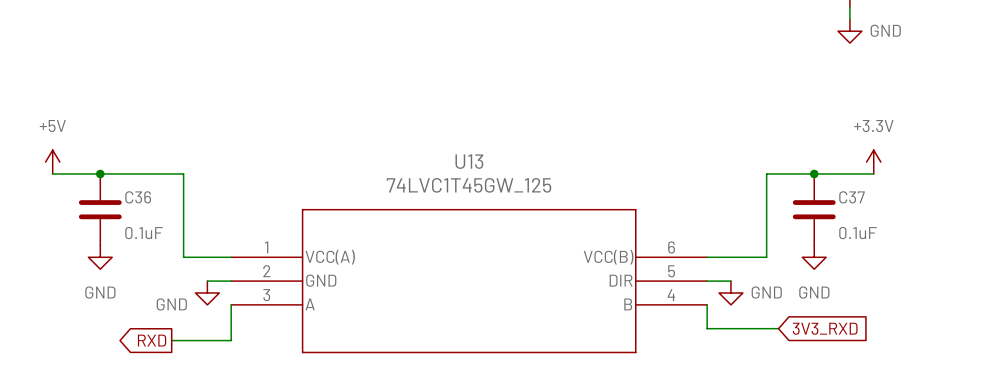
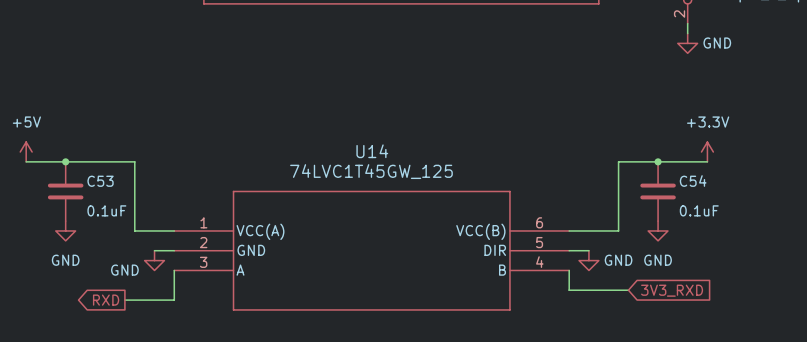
U13 name: U13 (469, 161) -> U14 (372, 151)
C36 name: C36 (138, 197) -> C53 (100, 181)
C37 name: C37 (852, 197) -> C54 (693, 181)

